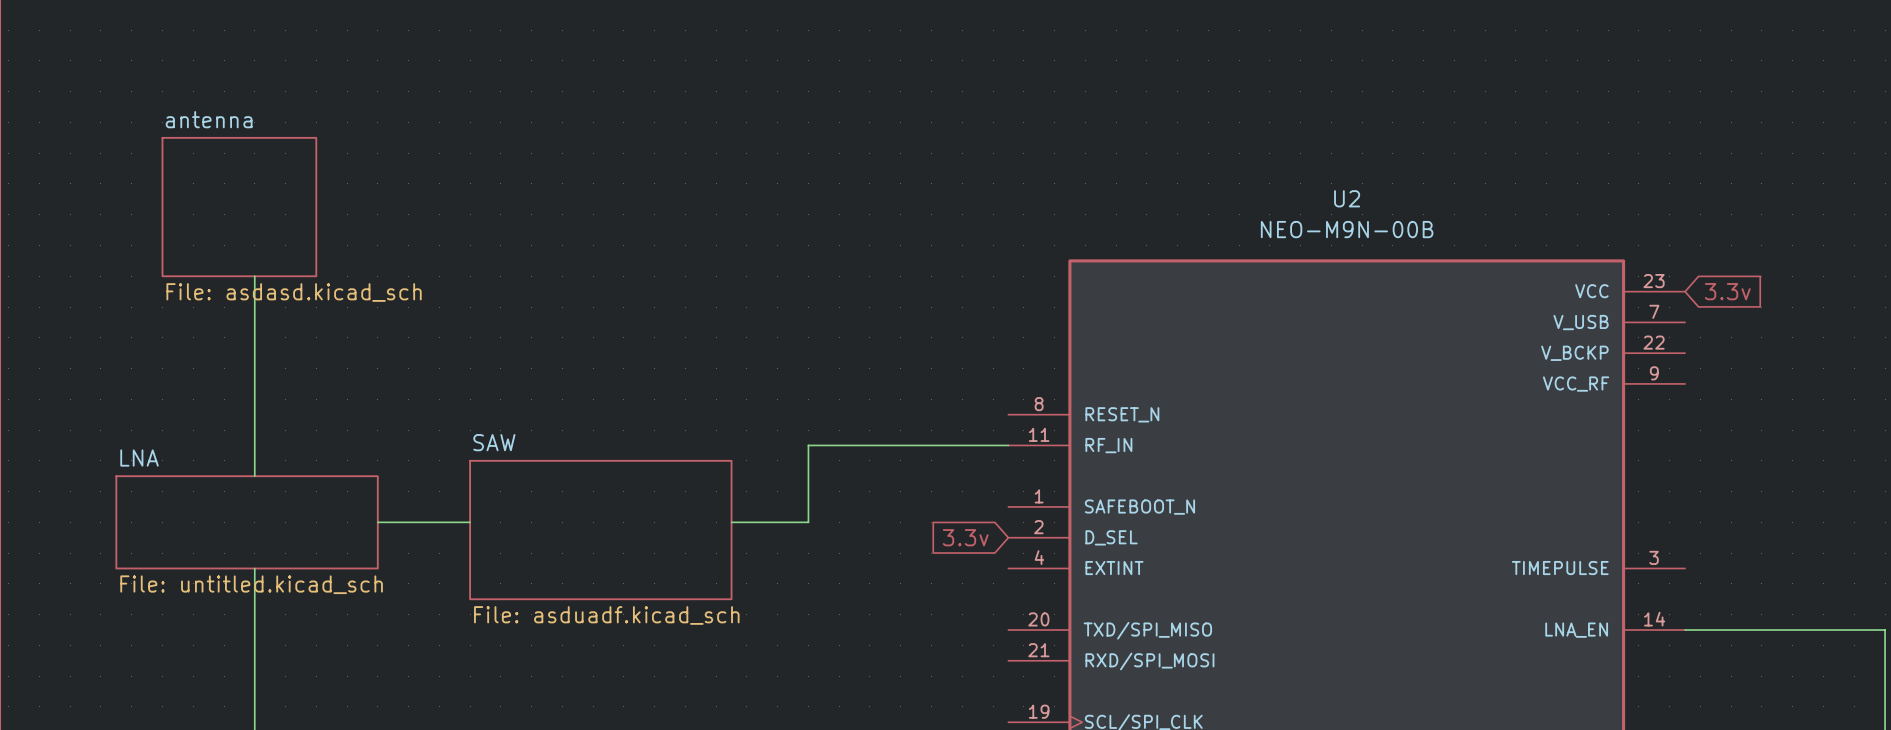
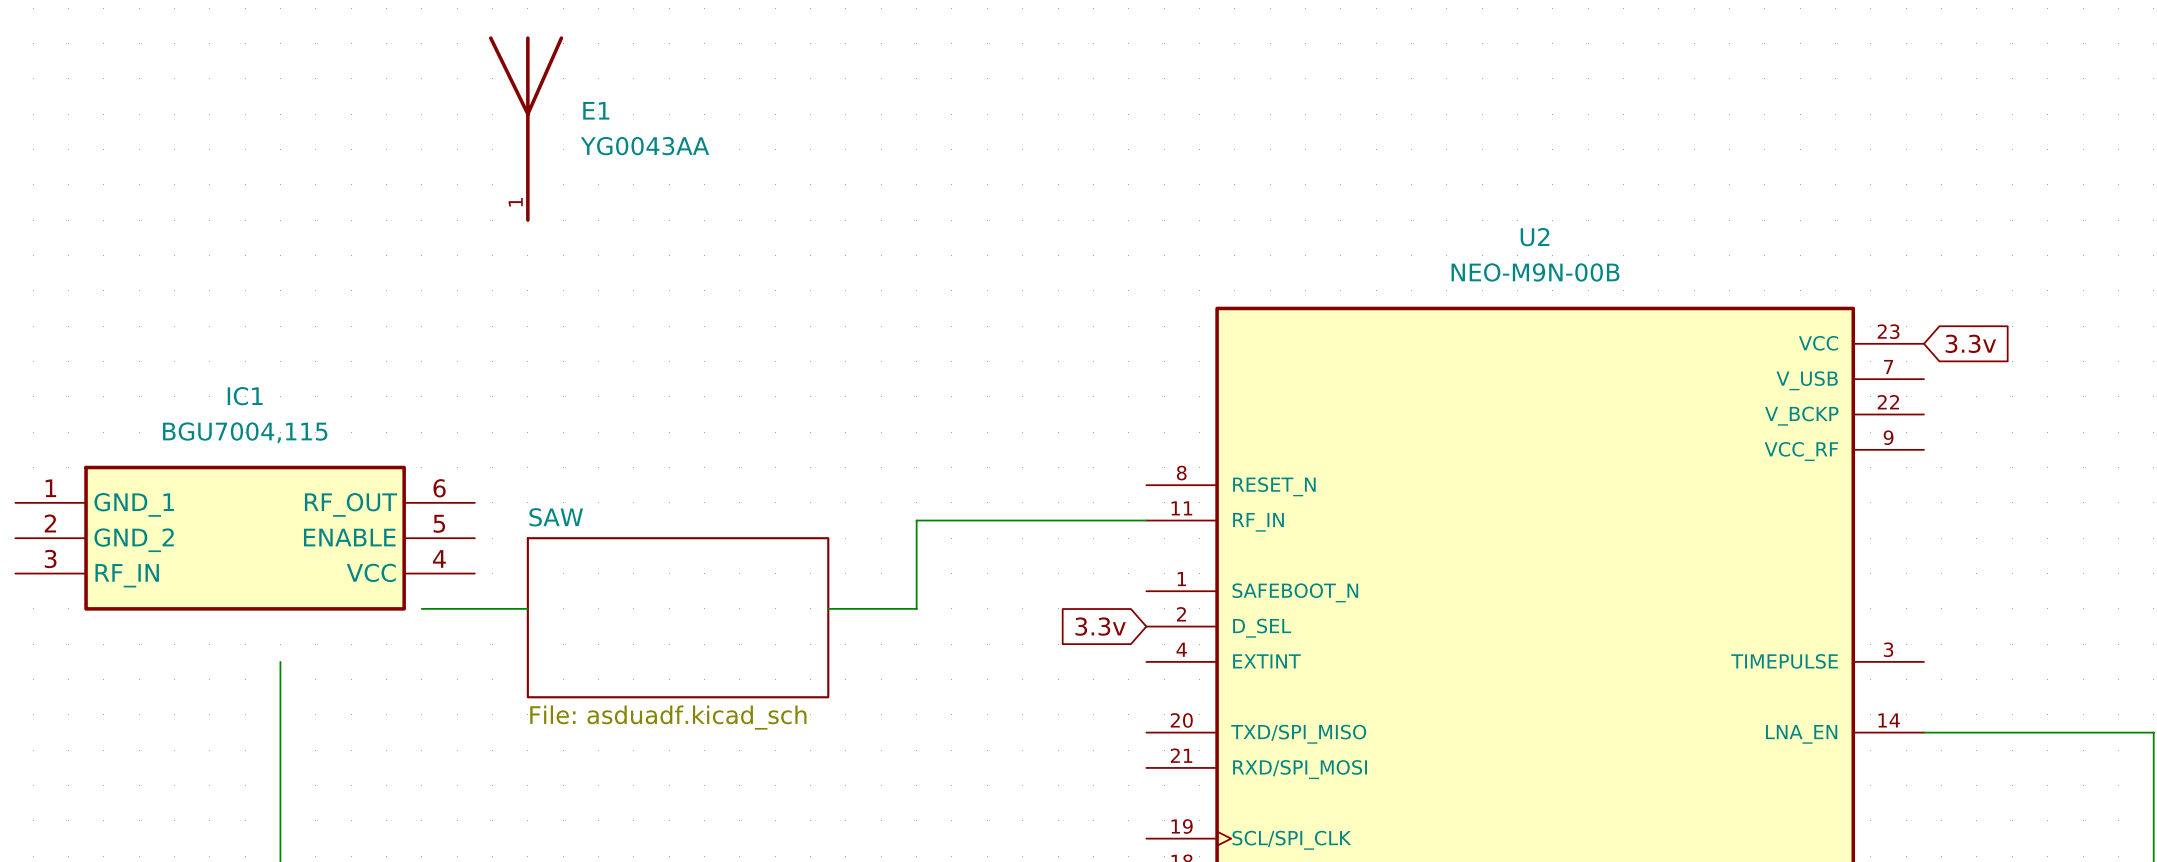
E1: none -> YG0043AA (526, 129)
sheet antenna: File: asdasd.kicad_sch (239, 207) -> none
wire: (254, 276) (254, 476) -> none
IC1: none -> BGU7004,115 (245, 538)
sheet LNA: File: untitled.kicad_sch (247, 522) -> none

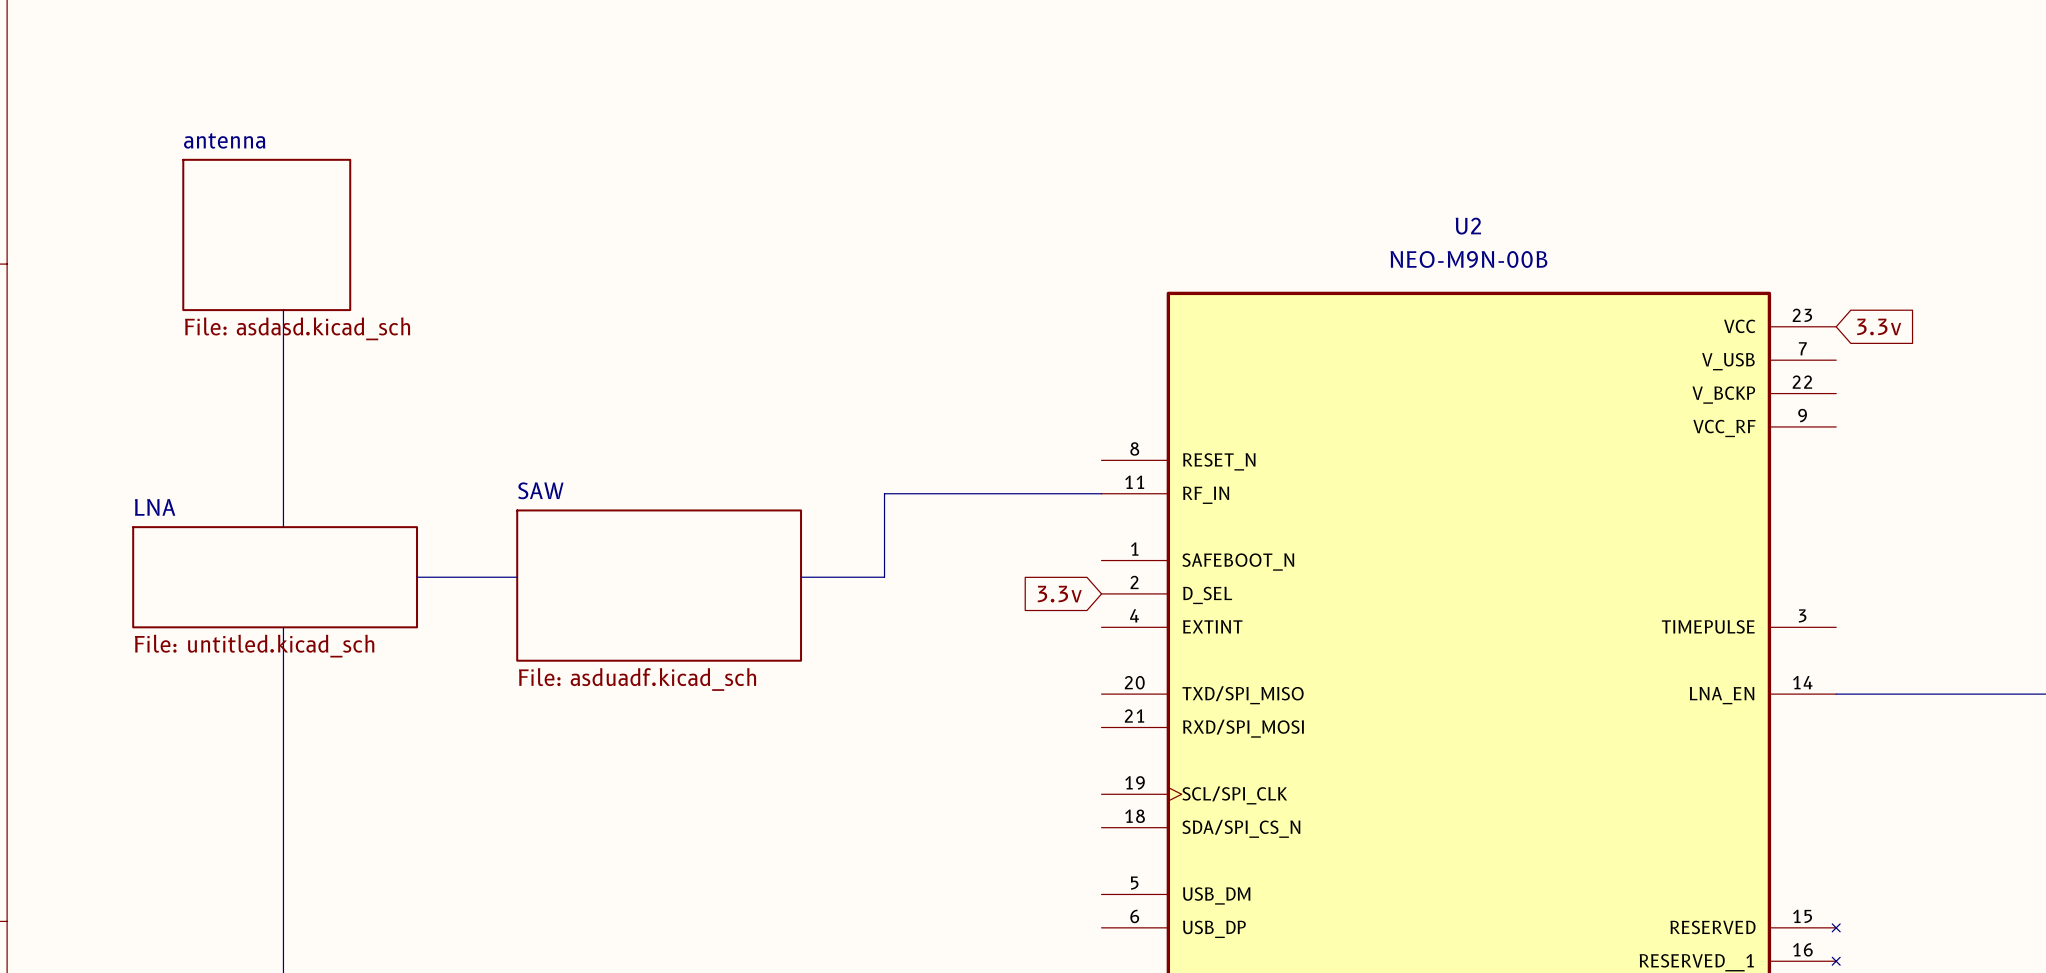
E1: YG0043AA (526, 129) -> none
sheet antenna: none -> File: asdasd.kicad_sch (266, 234)
wire: none -> (283, 310) (283, 527)
IC1: BGU7004,115 (245, 538) -> none
sheet LNA: none -> File: untitled.kicad_sch (275, 577)

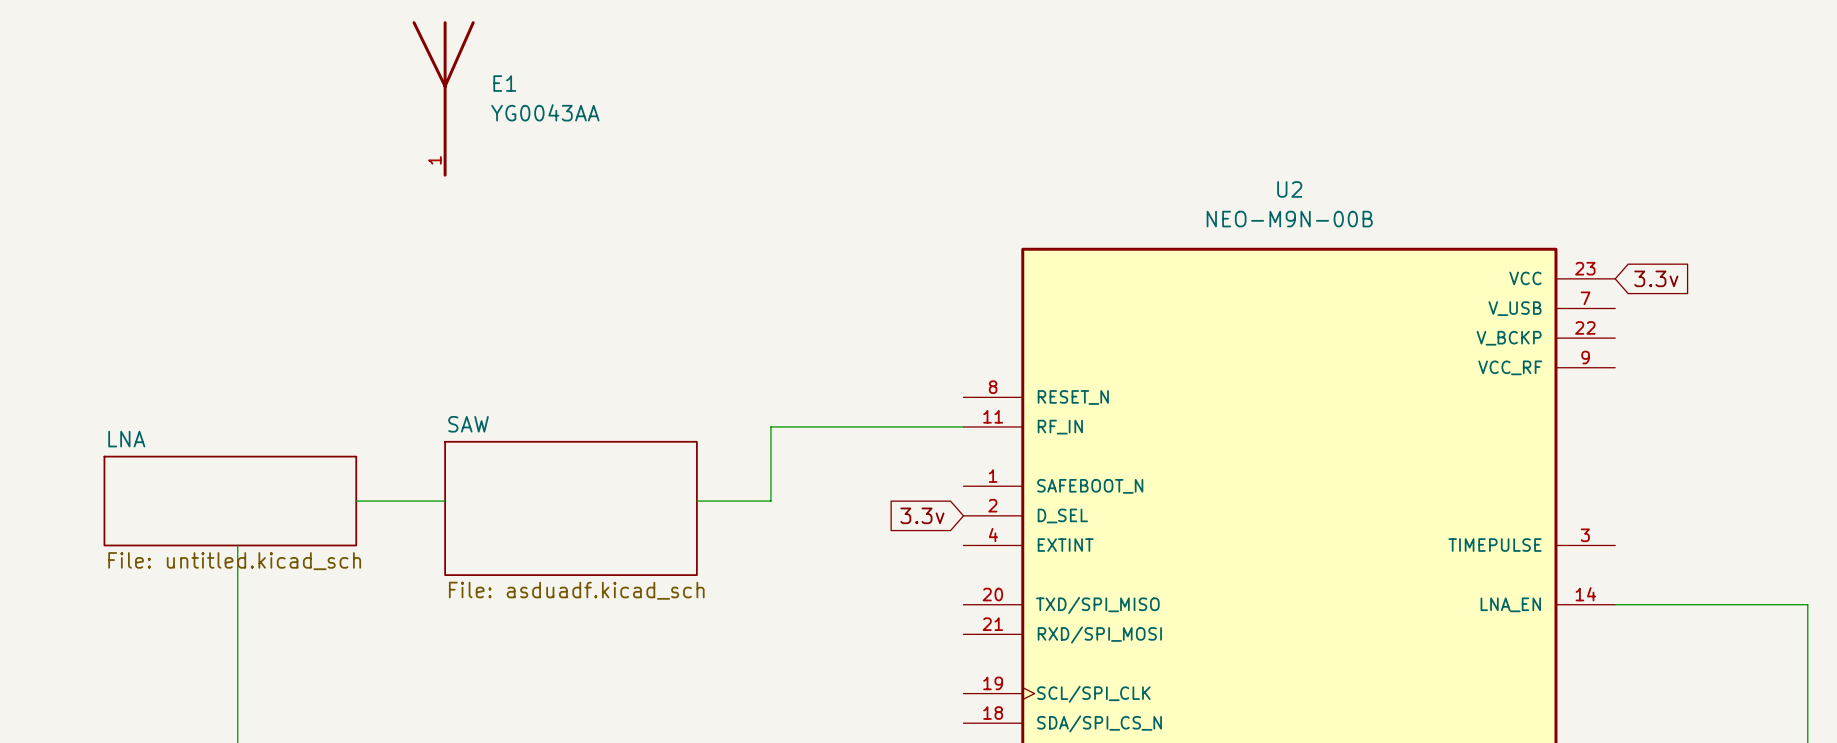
E1: none -> YG0043AA (443, 98)
sheet antenna: File: asdasd.kicad_sch (266, 234) -> none
wire: (283, 310) (283, 527) -> none

